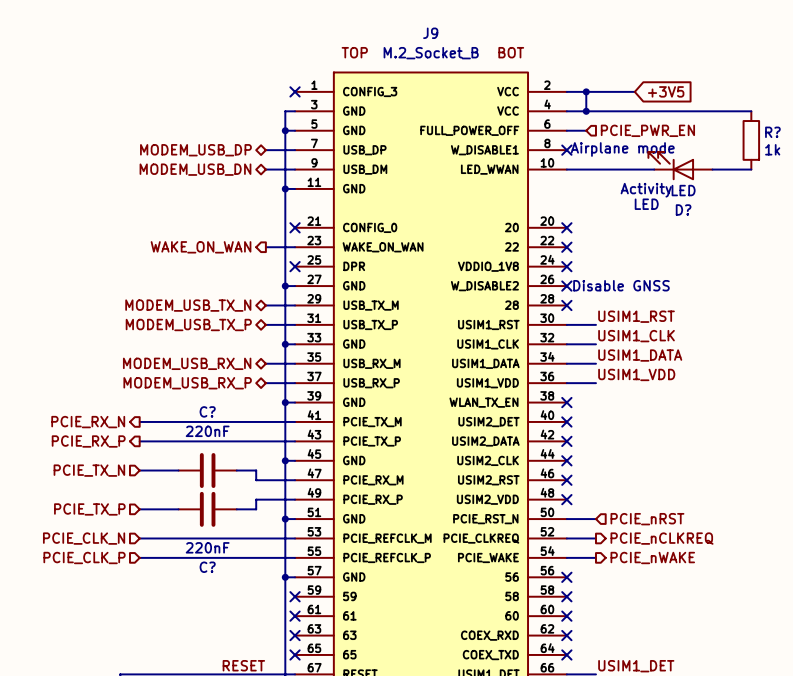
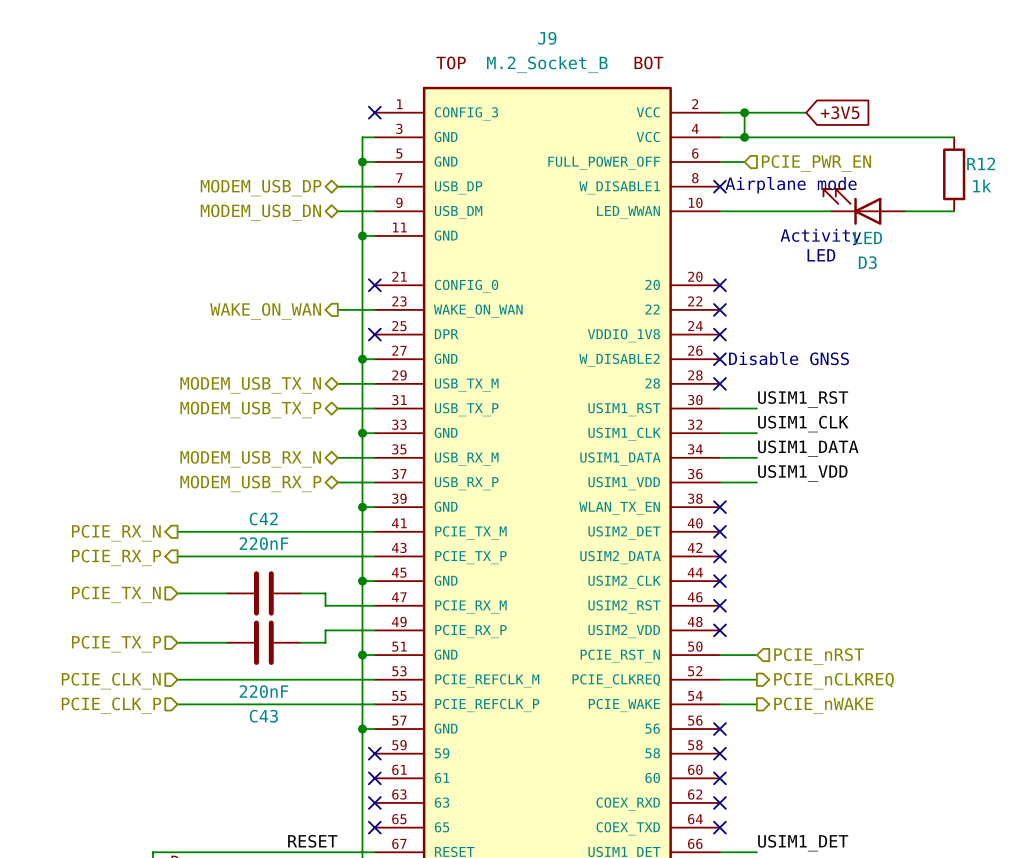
R? name: R? (772, 132) -> R12 (981, 163)
D? name: D? (683, 209) -> D3 (867, 262)
C? name: C? (207, 411) -> C42 (263, 519)
C? name: C? (207, 567) -> C43 (263, 716)

